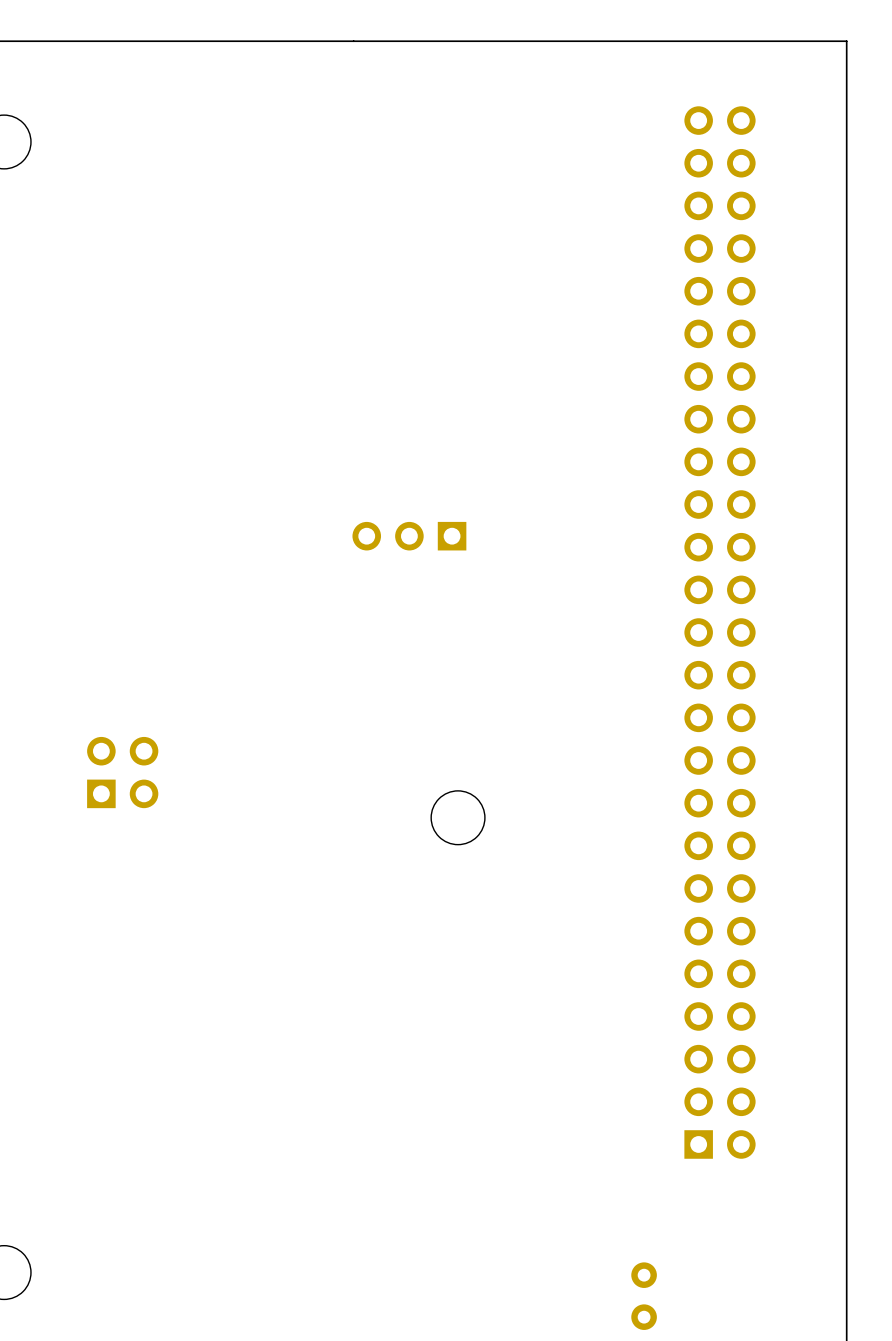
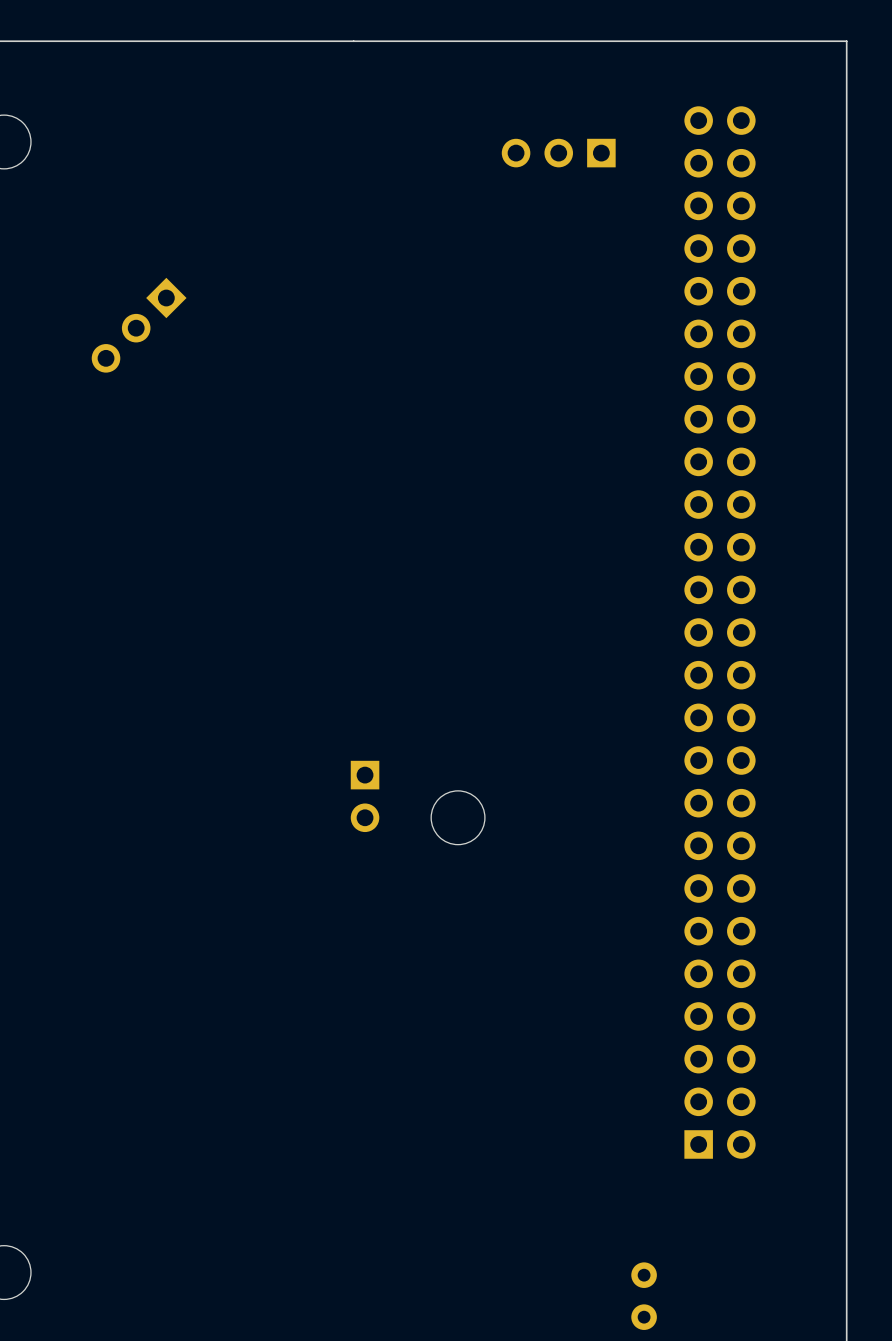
part: none -> (139, 325)
part position: (409, 536) -> (558, 153)
part: (122, 772) -> none
part: none -> (365, 796)

